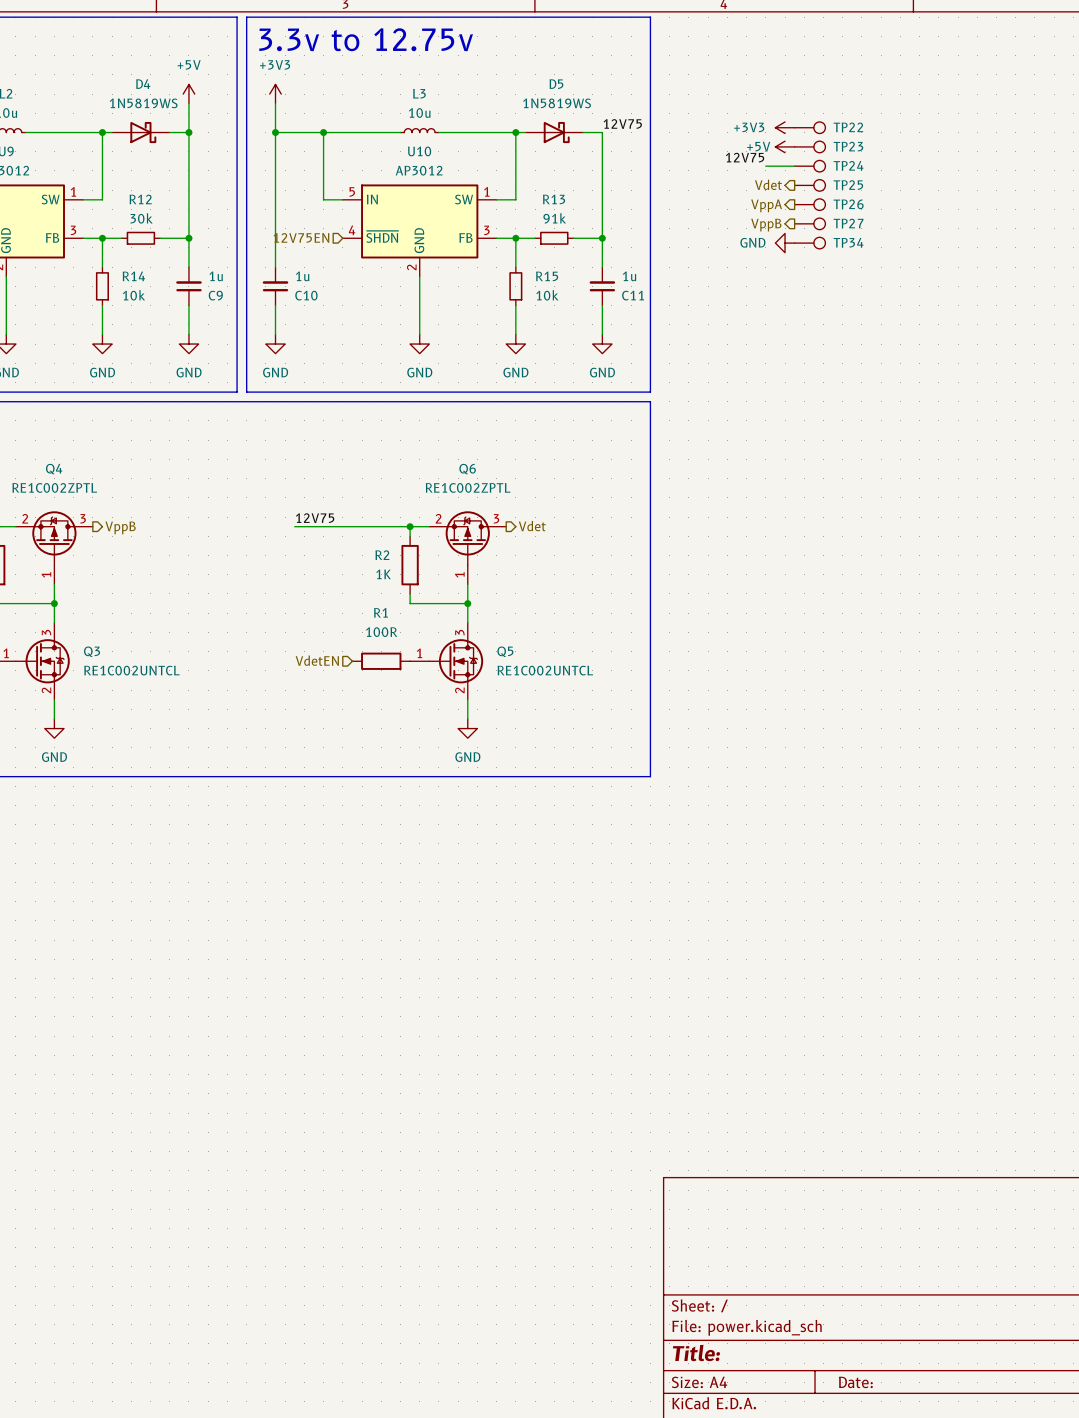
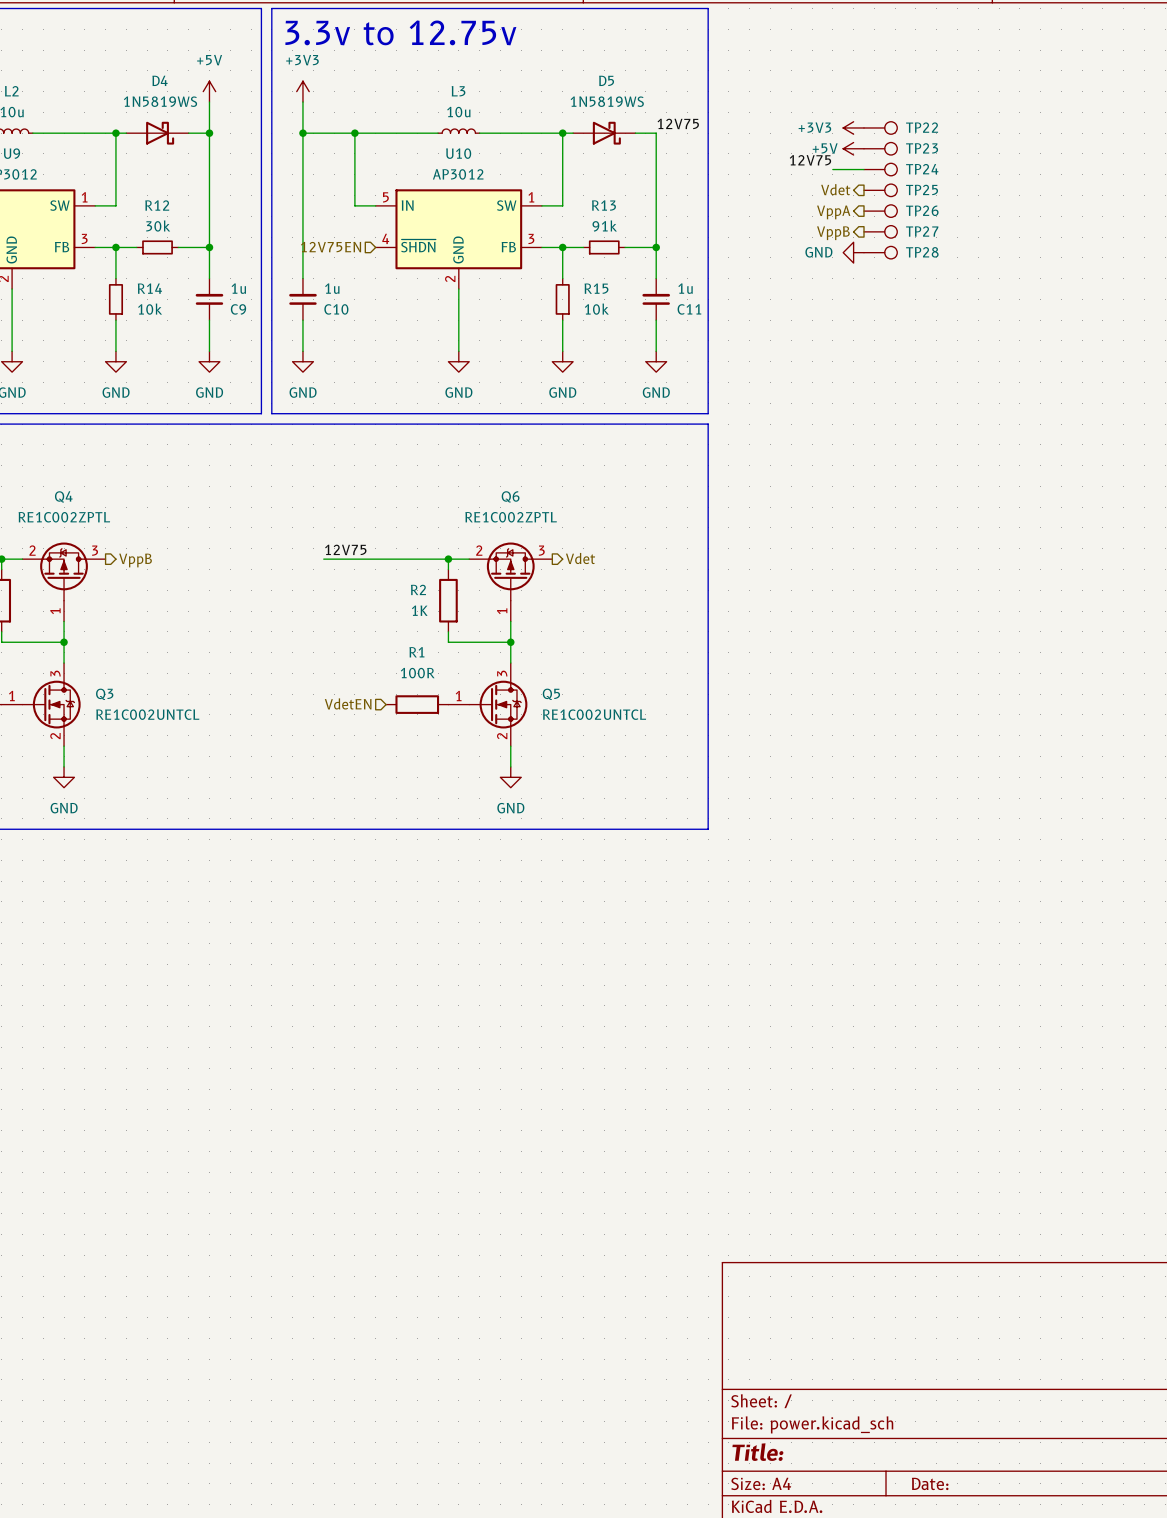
TP34 name: TP34 (848, 242) -> TP28 (922, 252)

